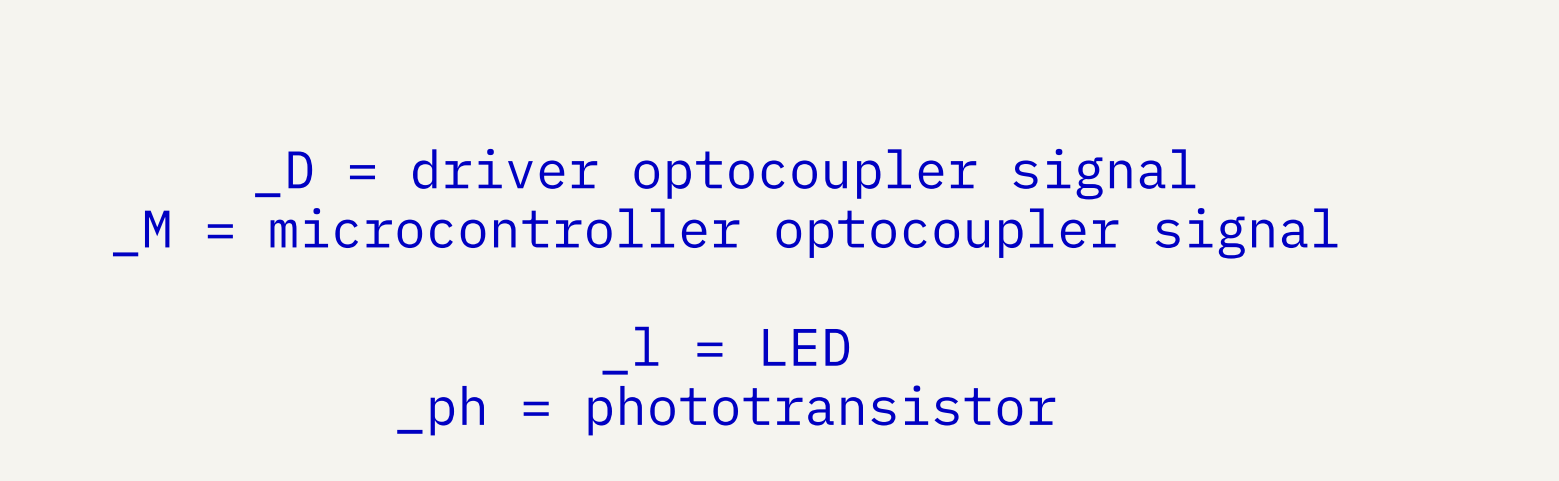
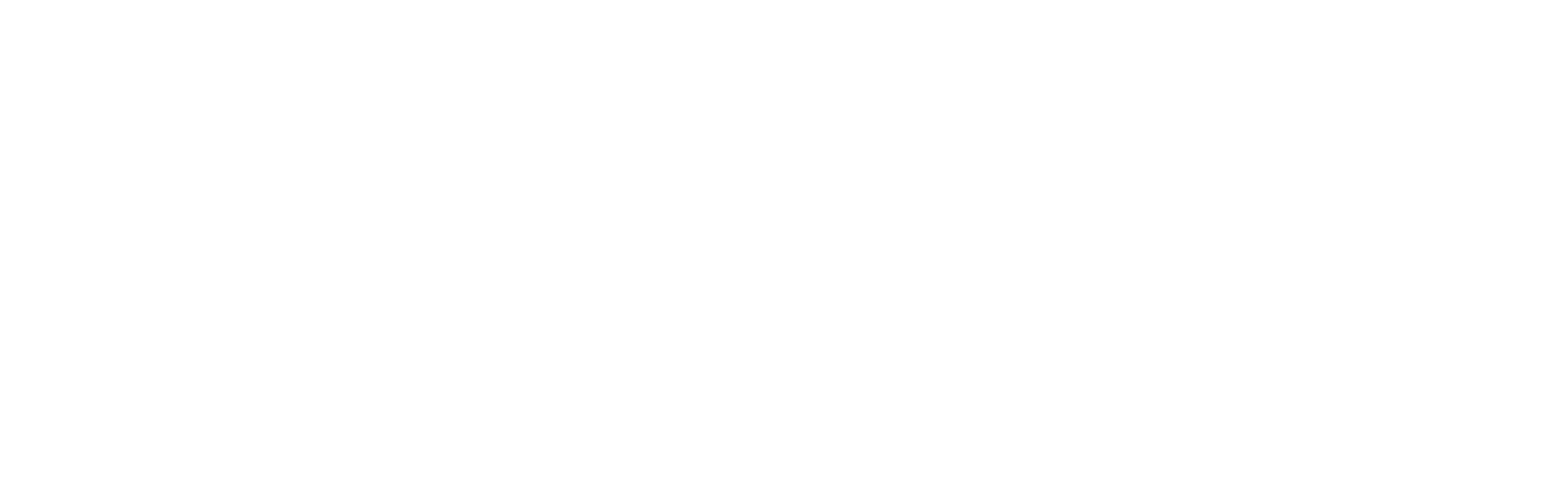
text: _D = driver optocoupler signal (725, 174) -> none
text: _M = microcontroller optocoupler signal (725, 233) -> none
text: _l = LED (725, 350) -> none
text: _ph = phototransistor (726, 410) -> none

